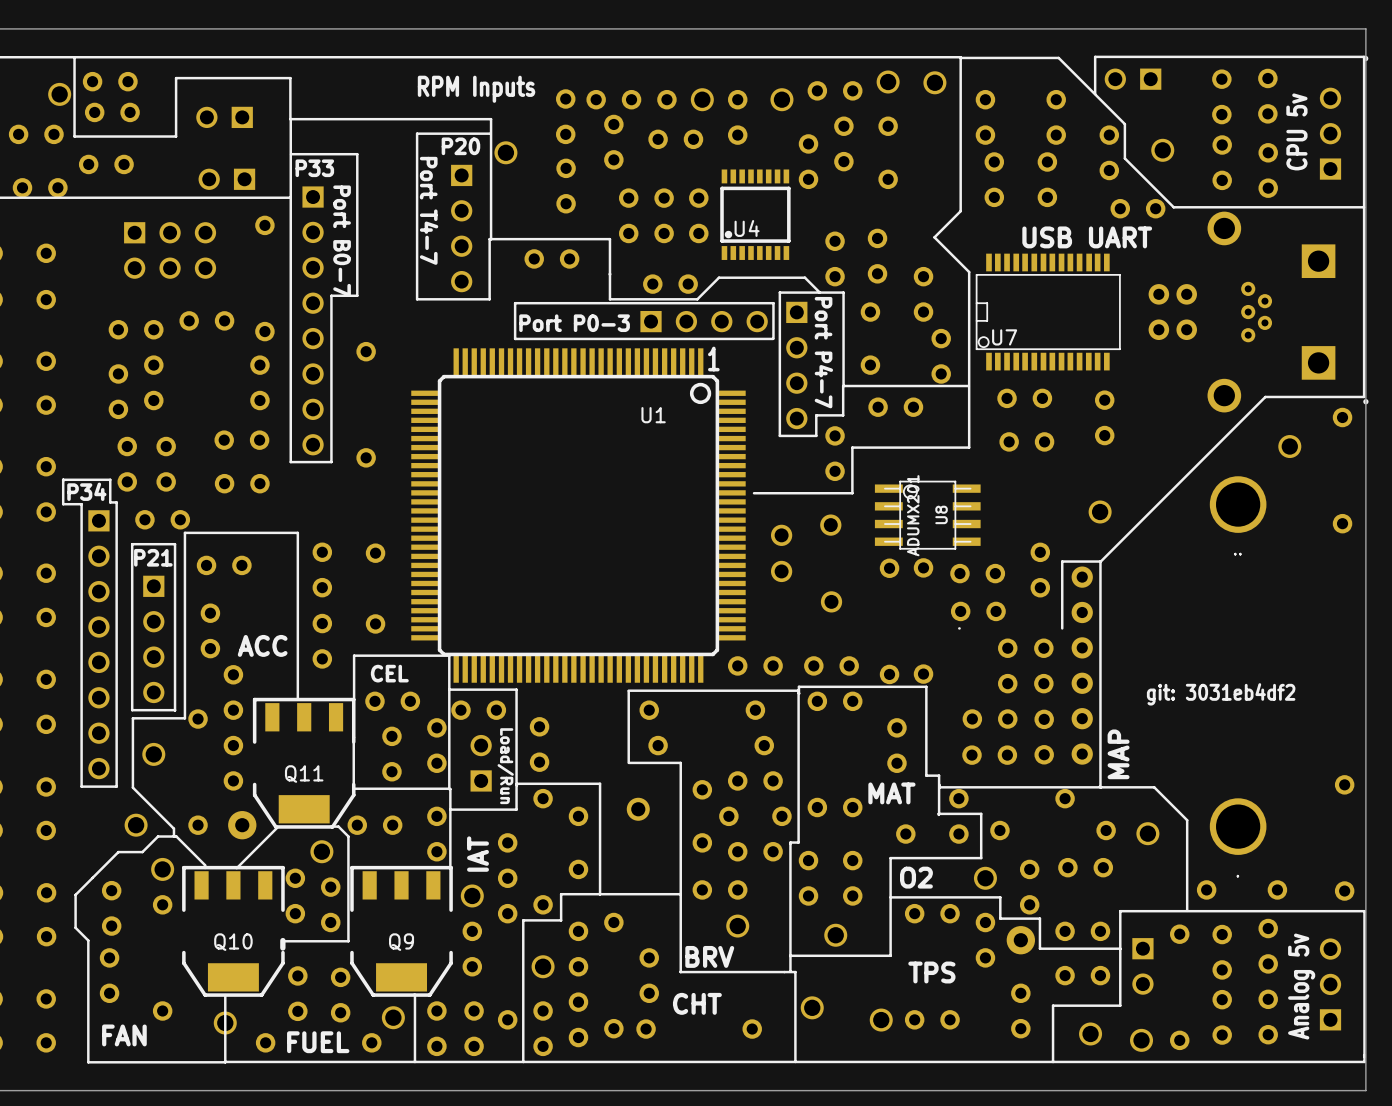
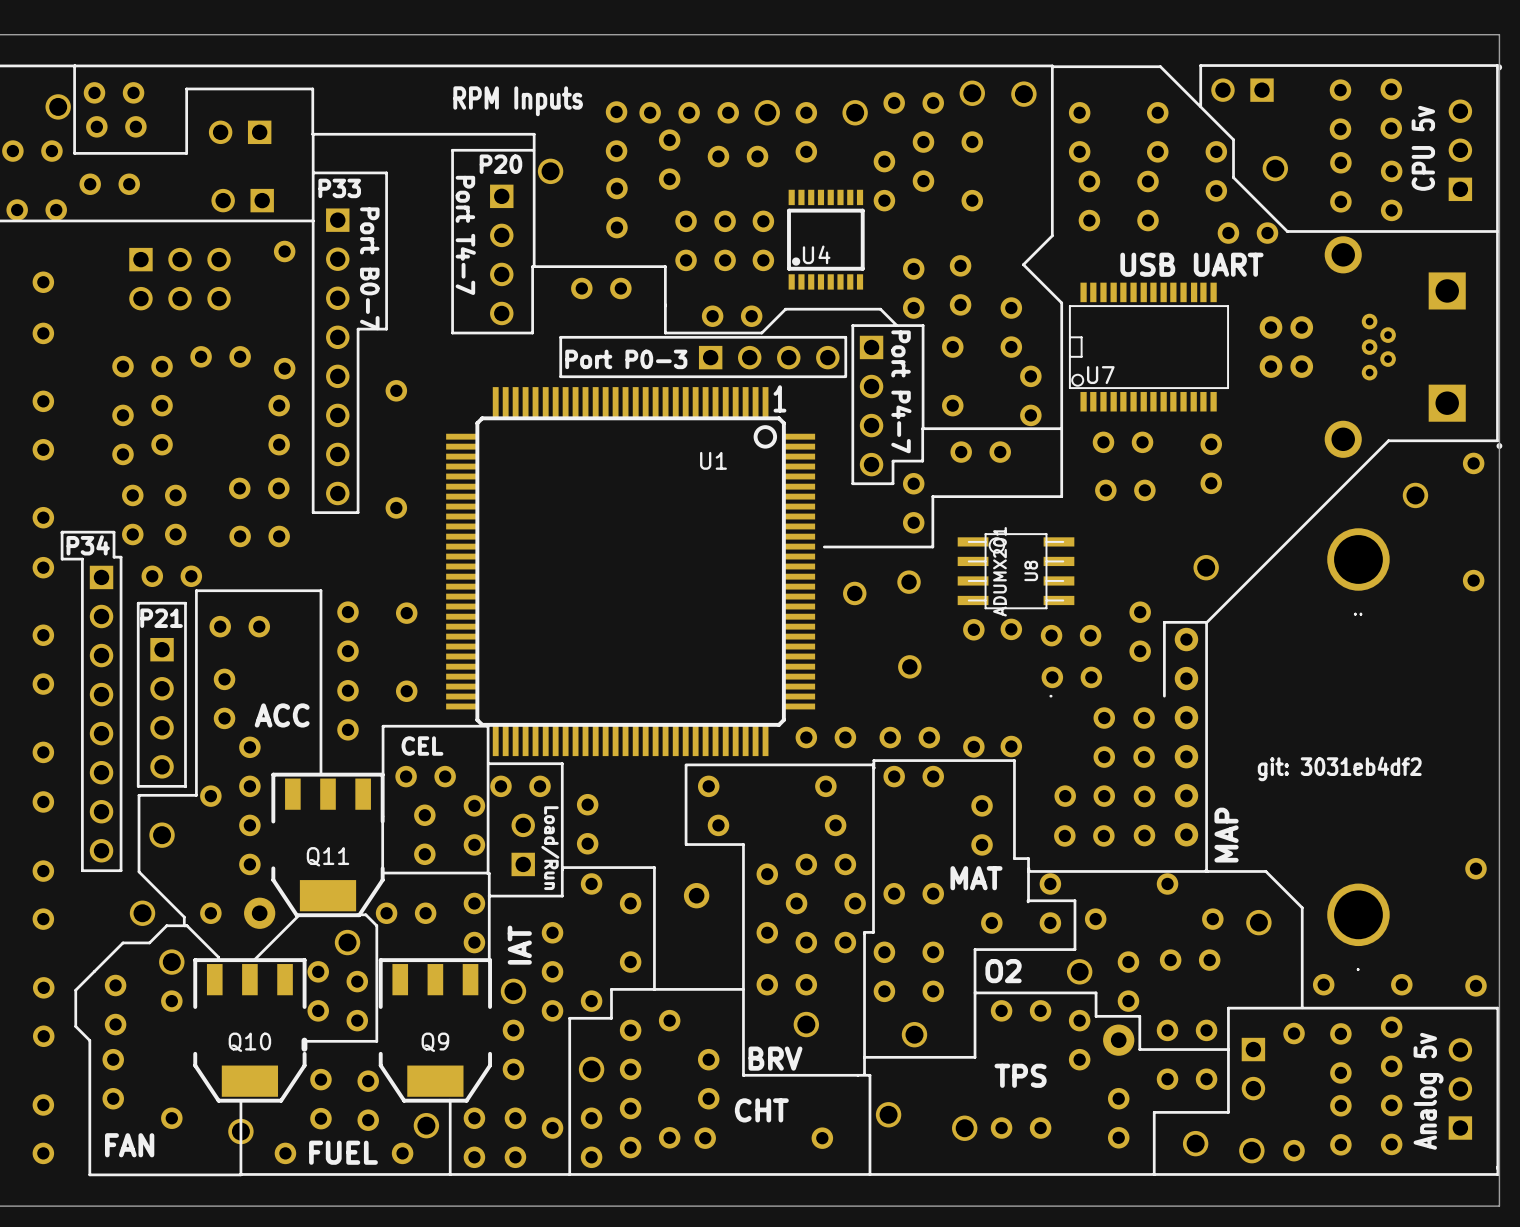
part: (781, 571) -> none

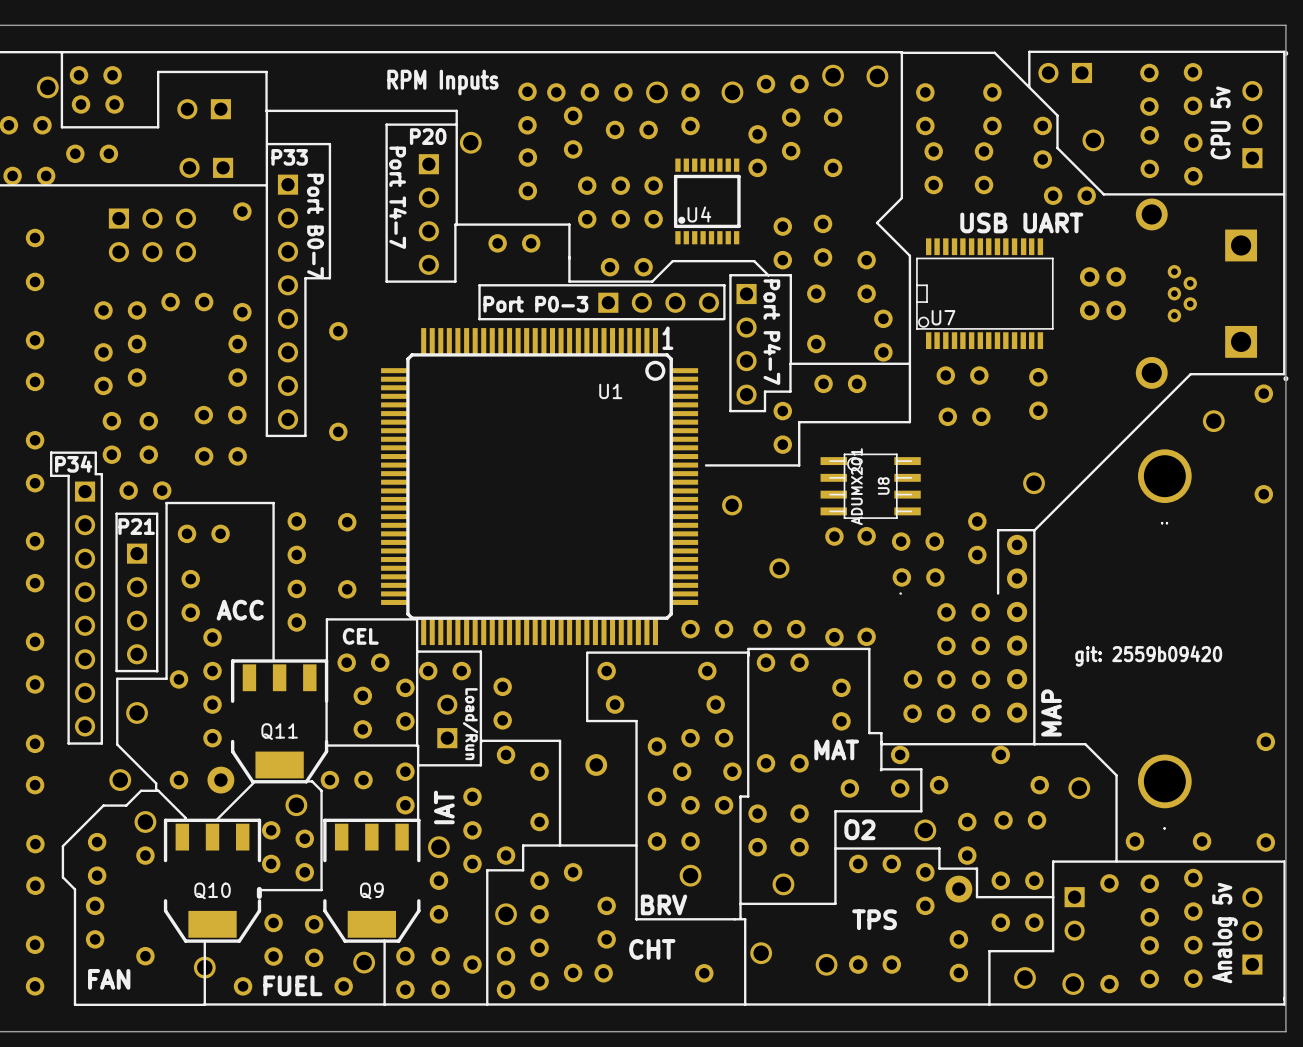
part: (909, 582) -> none
text: git: 3031eb4df2 (1339, 768) -> git: 2559b09420 (1148, 656)

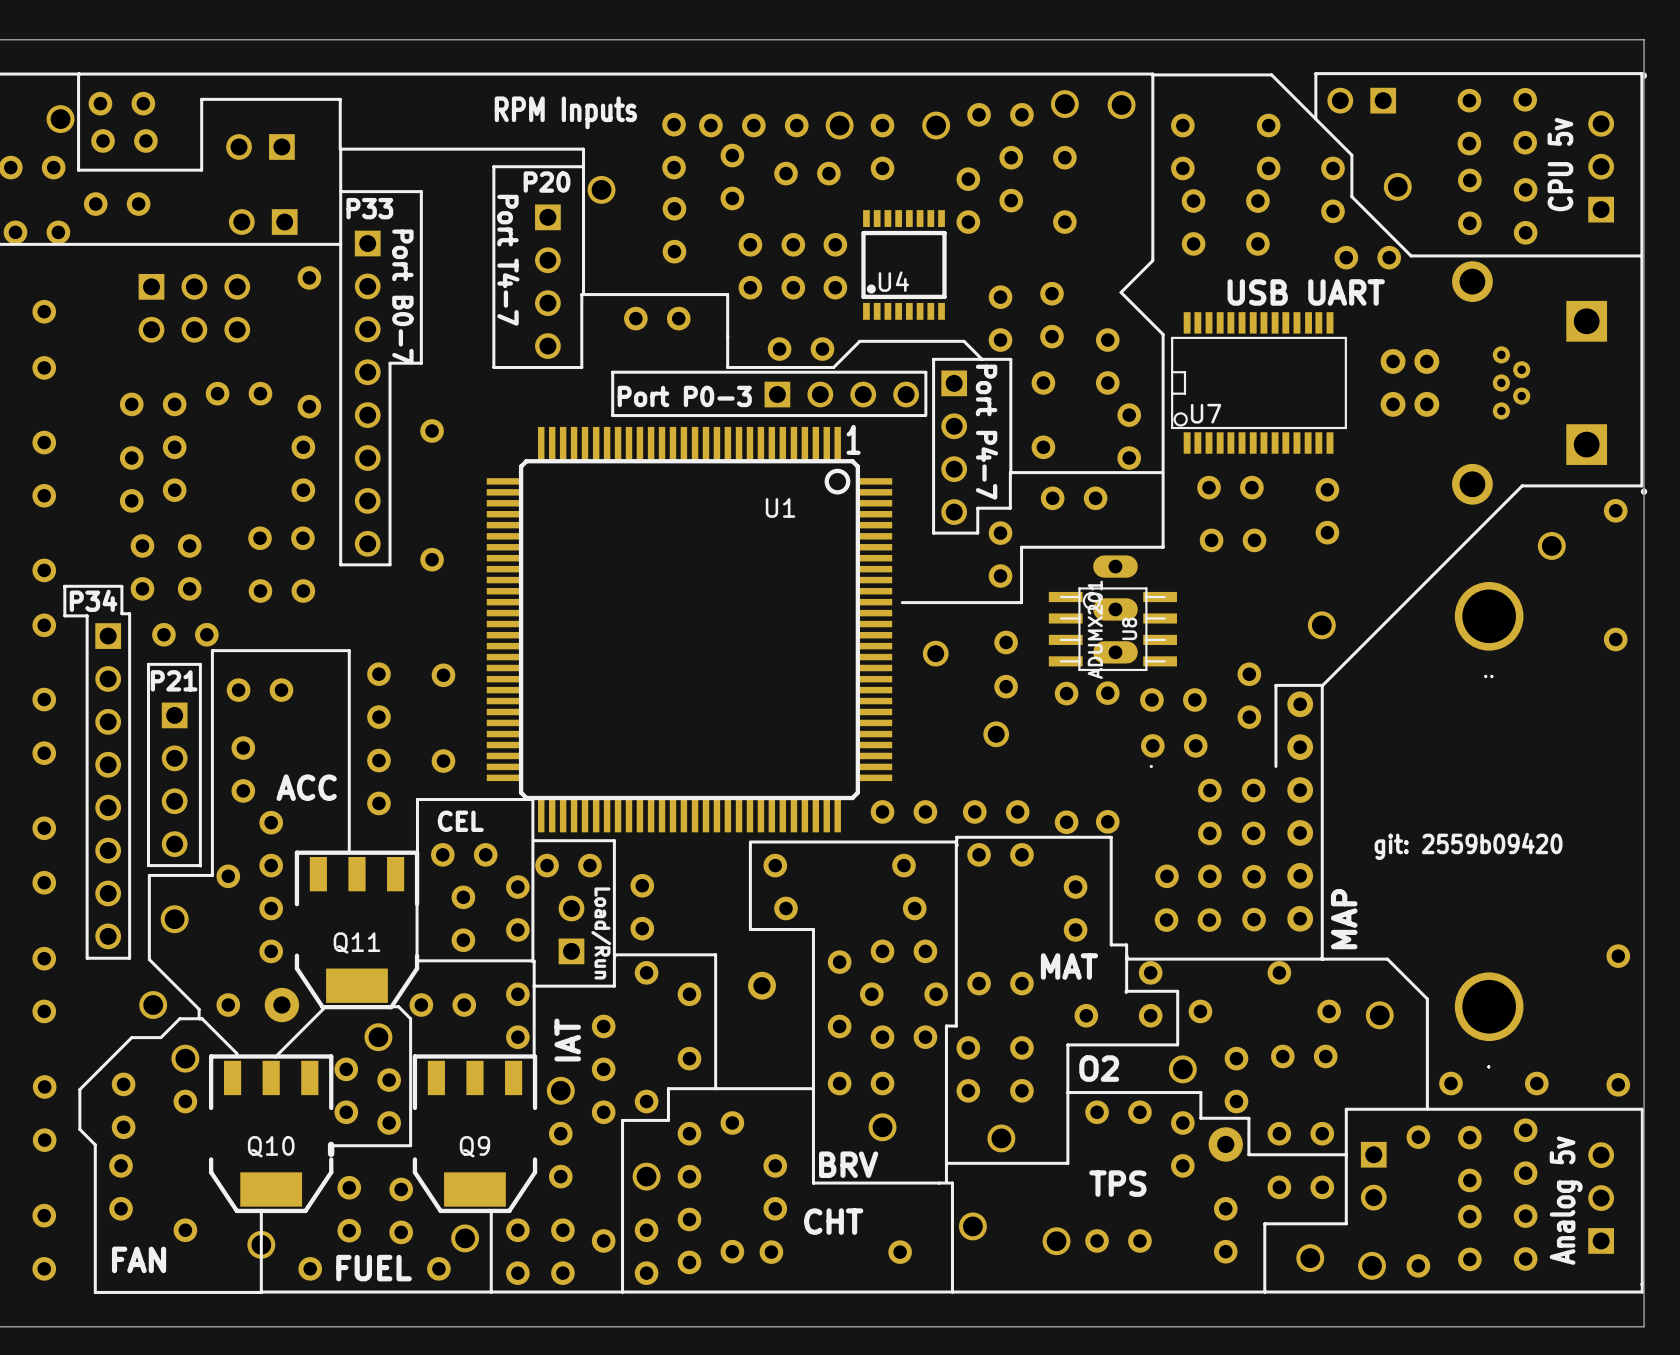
part: none -> (1115, 609)
part: none -> (1006, 642)
part: none -> (1006, 686)

